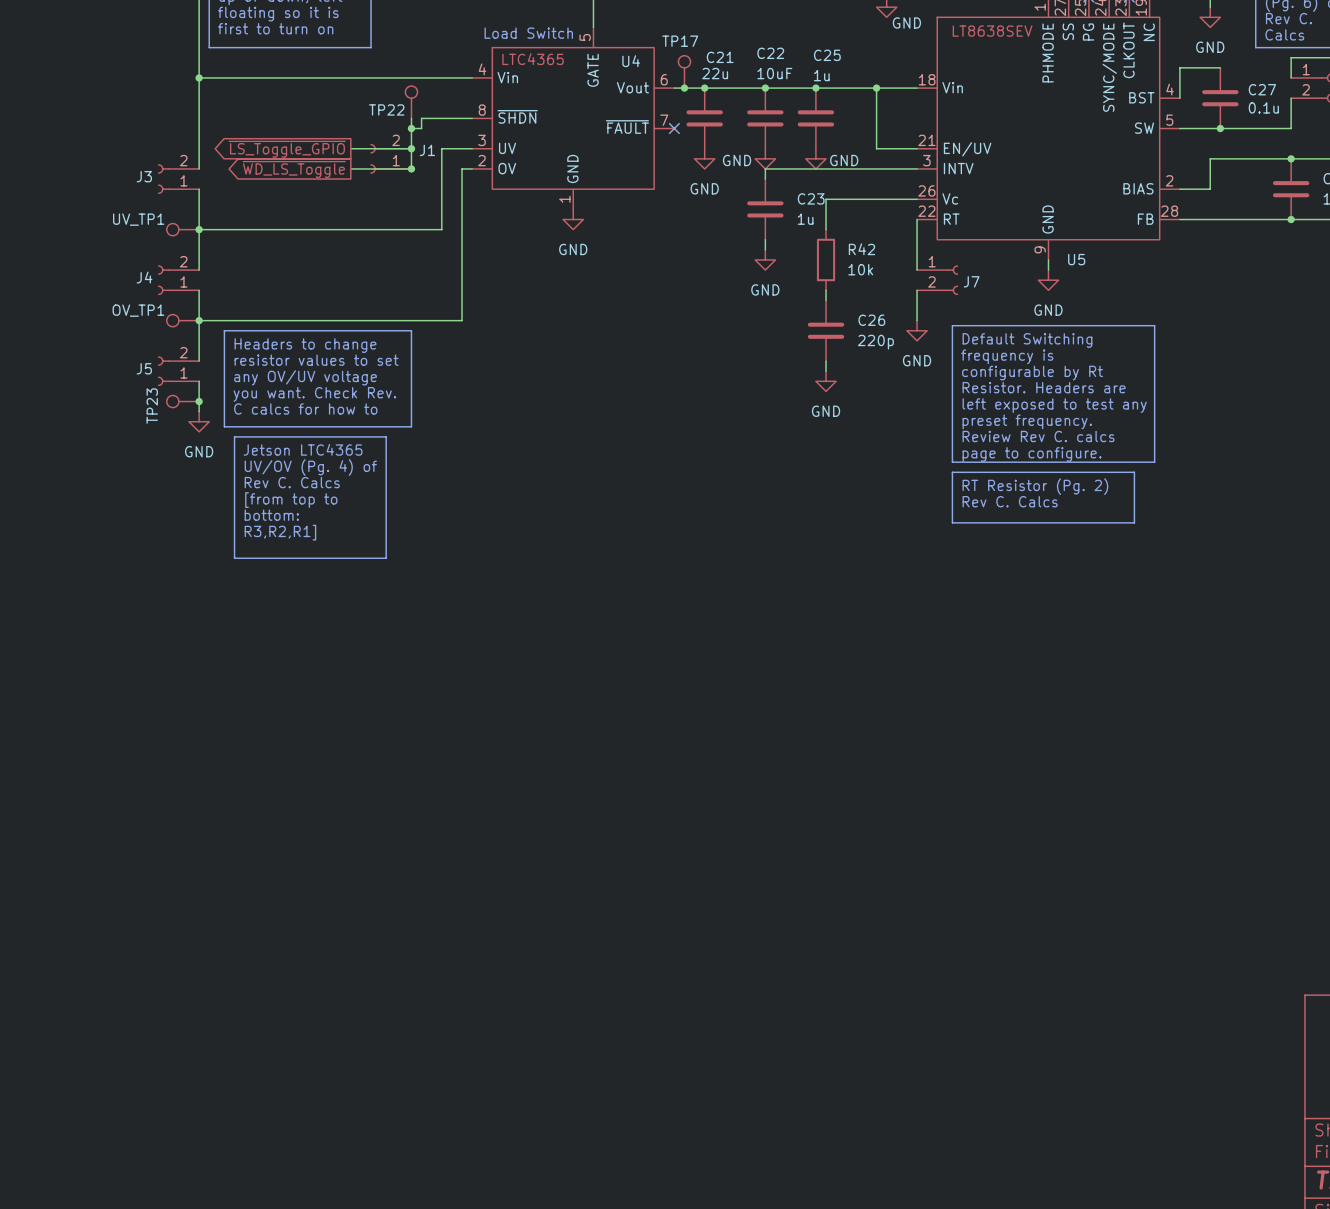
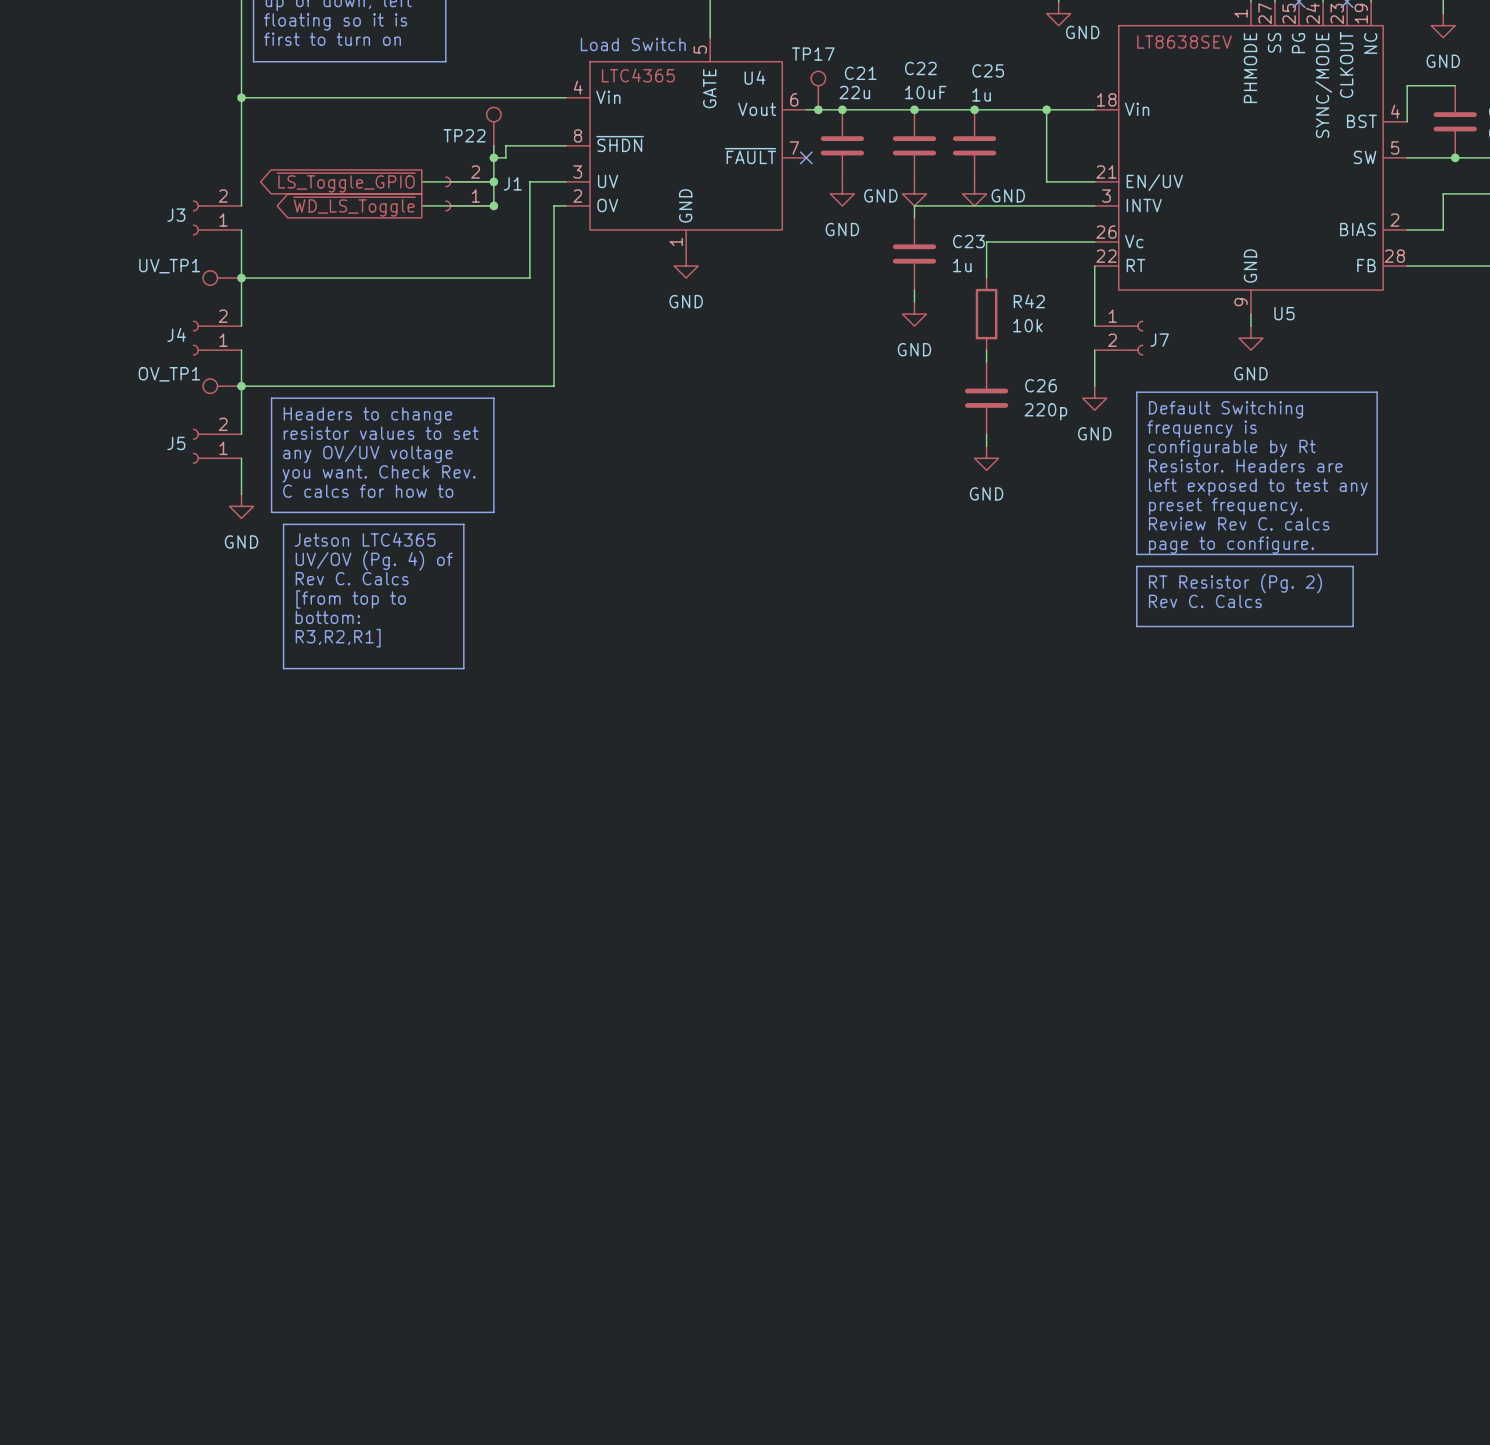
TP23: (182, 401) -> none
junction: (199, 401) -> none

